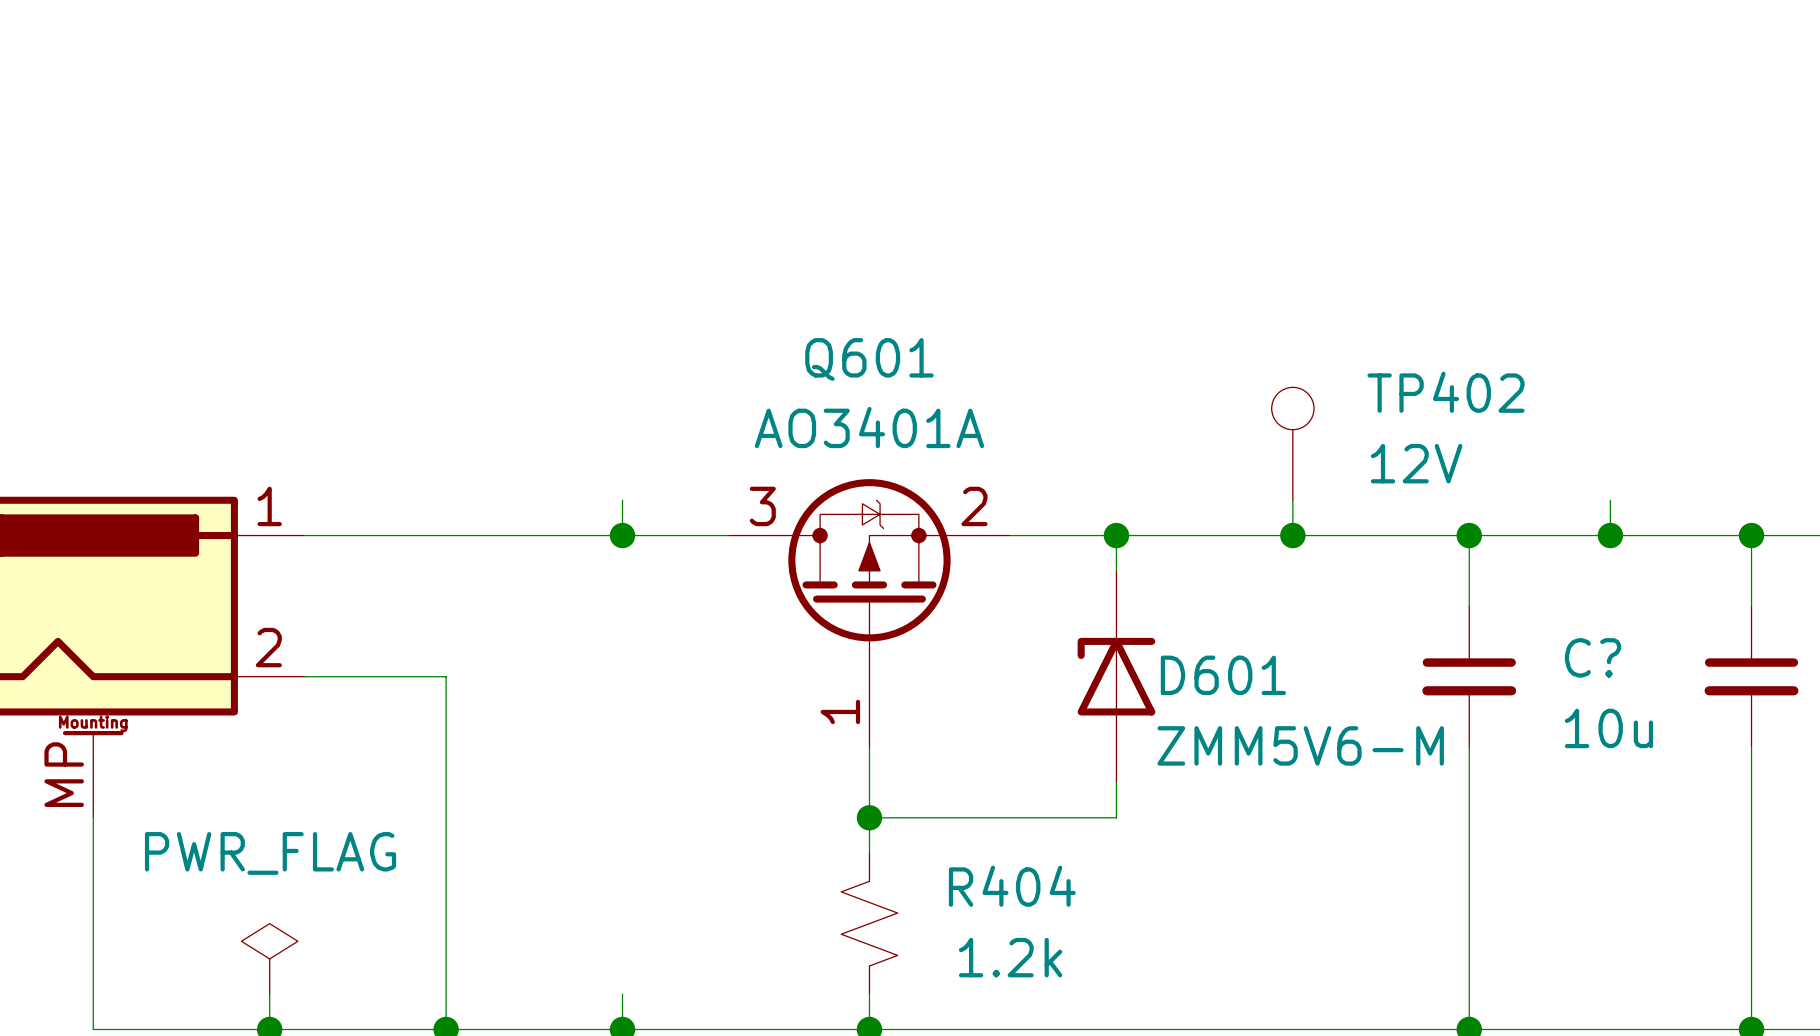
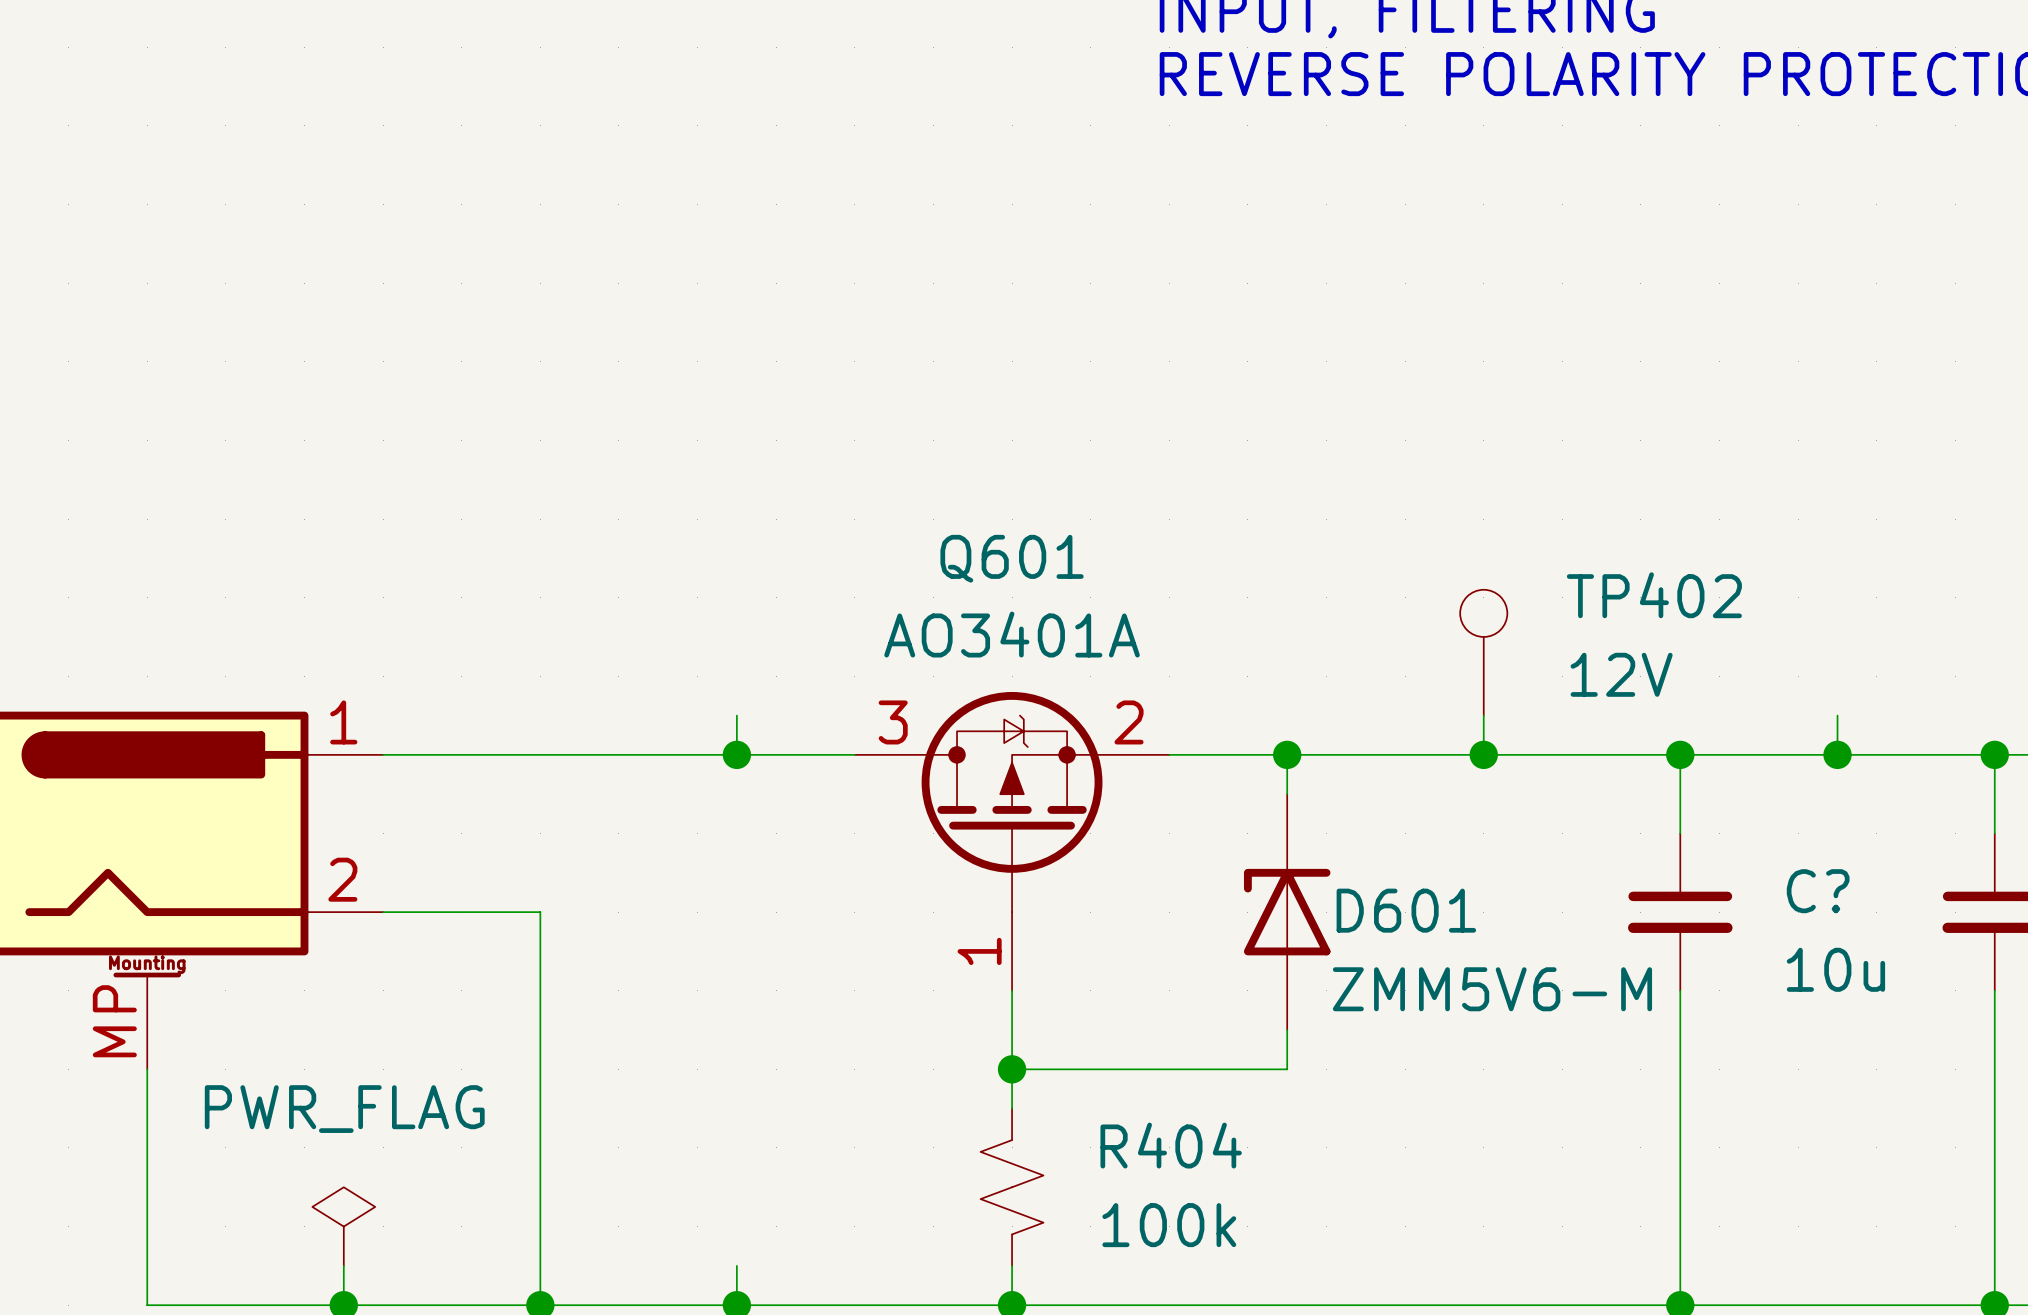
R404 value: 1.2k (1010, 957) -> 100k (1169, 1225)

